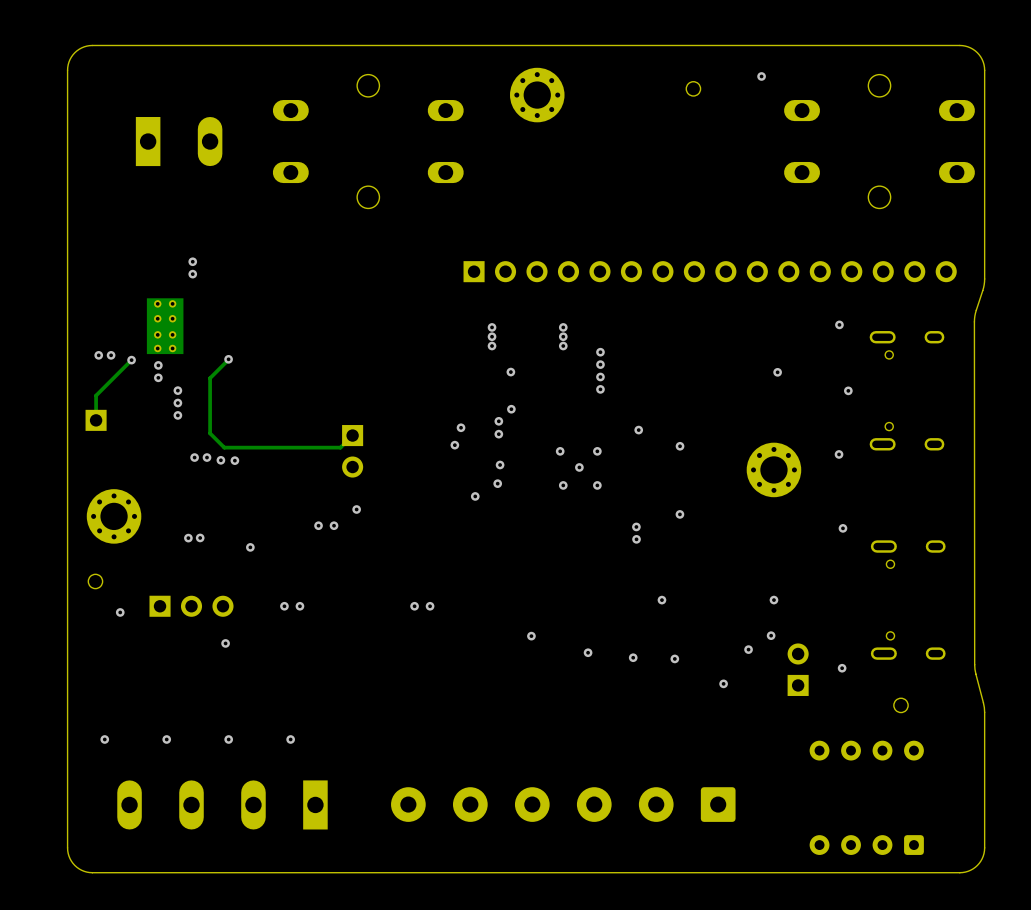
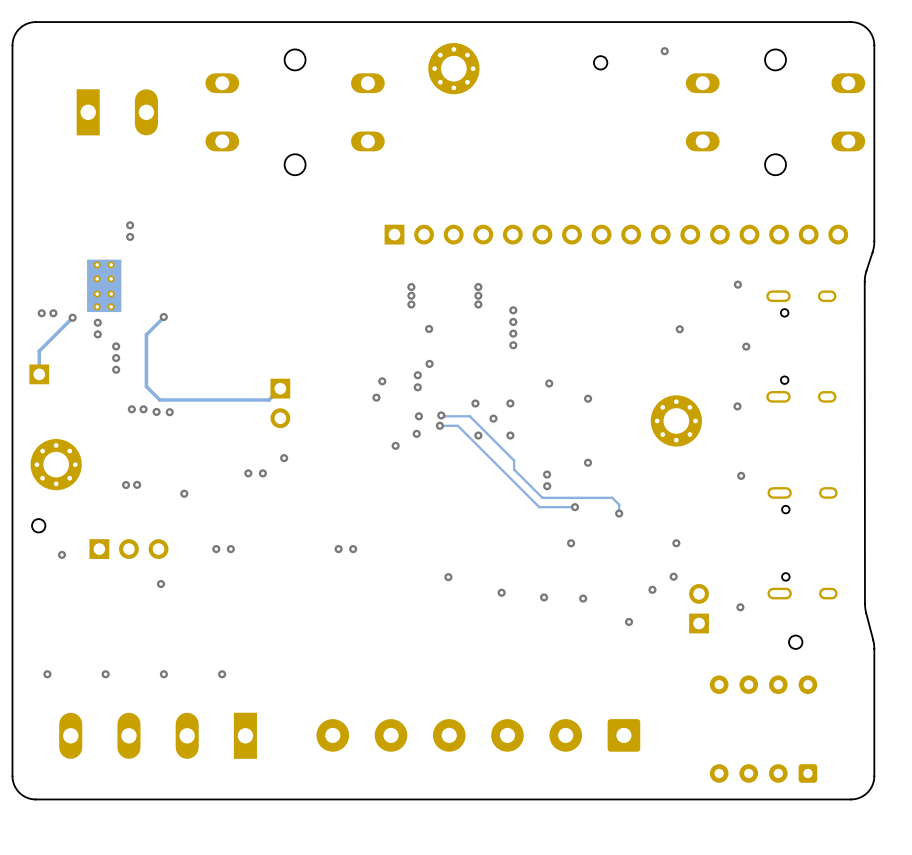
track: none -> (438, 415) (469, 416) (514, 460) (514, 469) (542, 497) (612, 497) (619, 504) (619, 513)
via: none -> (441, 415)
track: none -> (437, 425) (457, 425) (539, 507) (575, 507)
via: none -> (439, 425)
via: none -> (575, 507)
via: none -> (619, 513)

